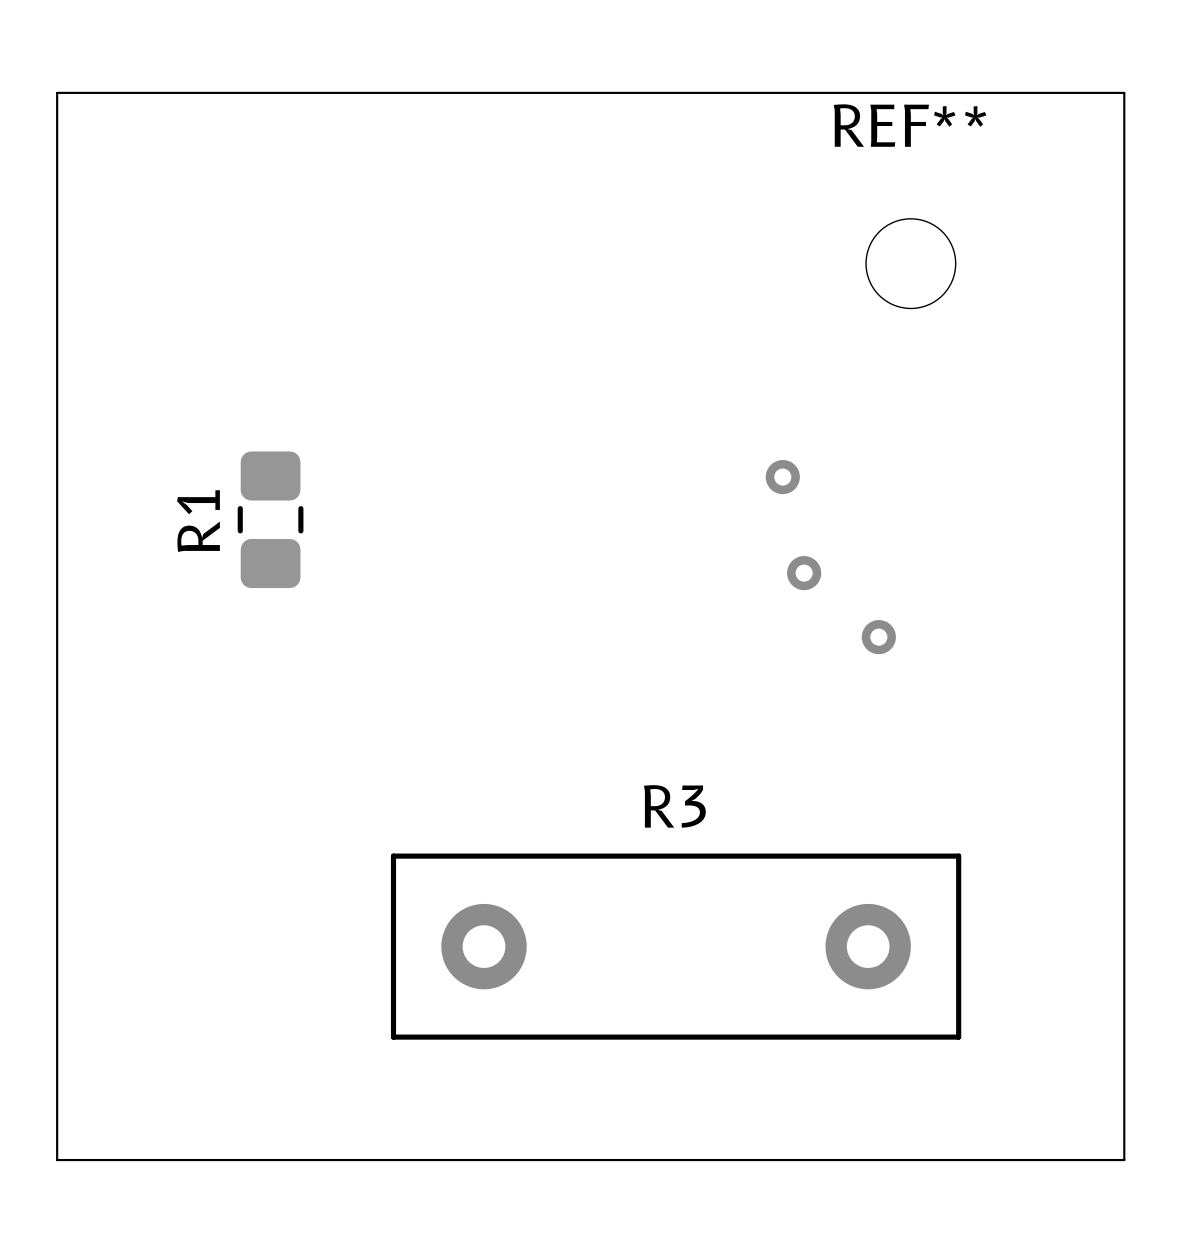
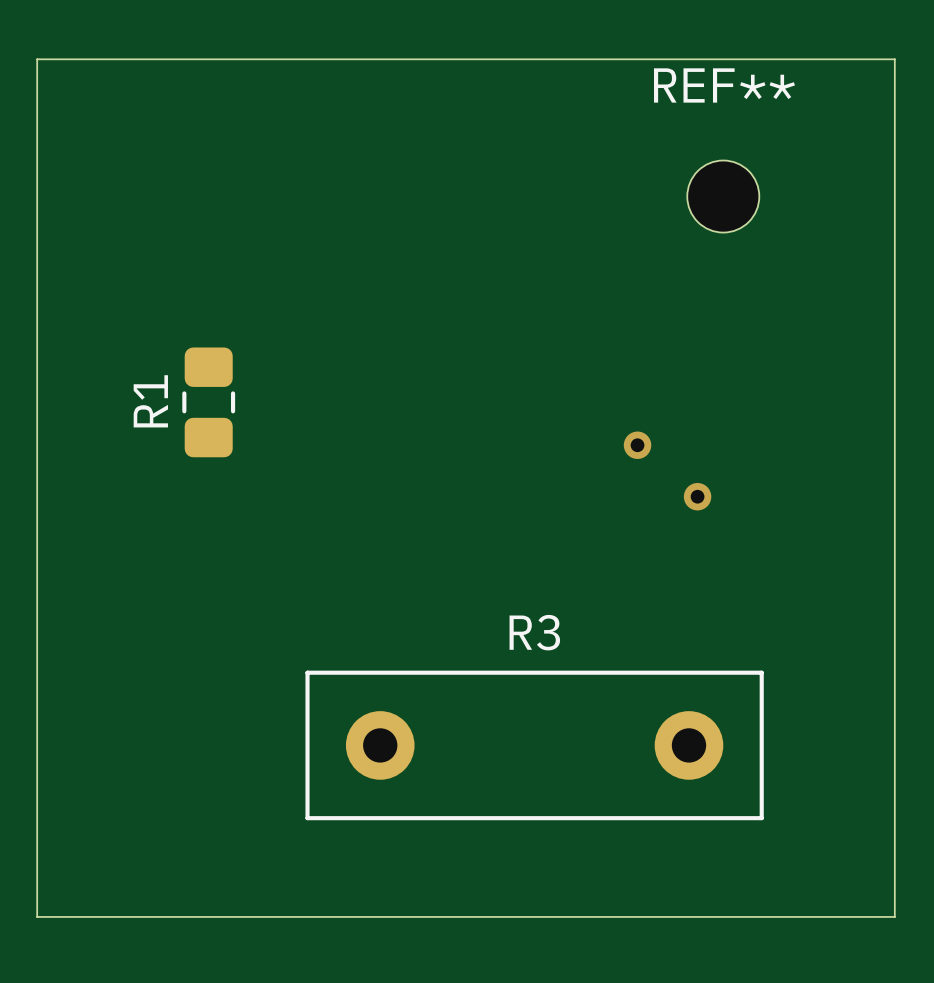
via: (782, 477) -> none

